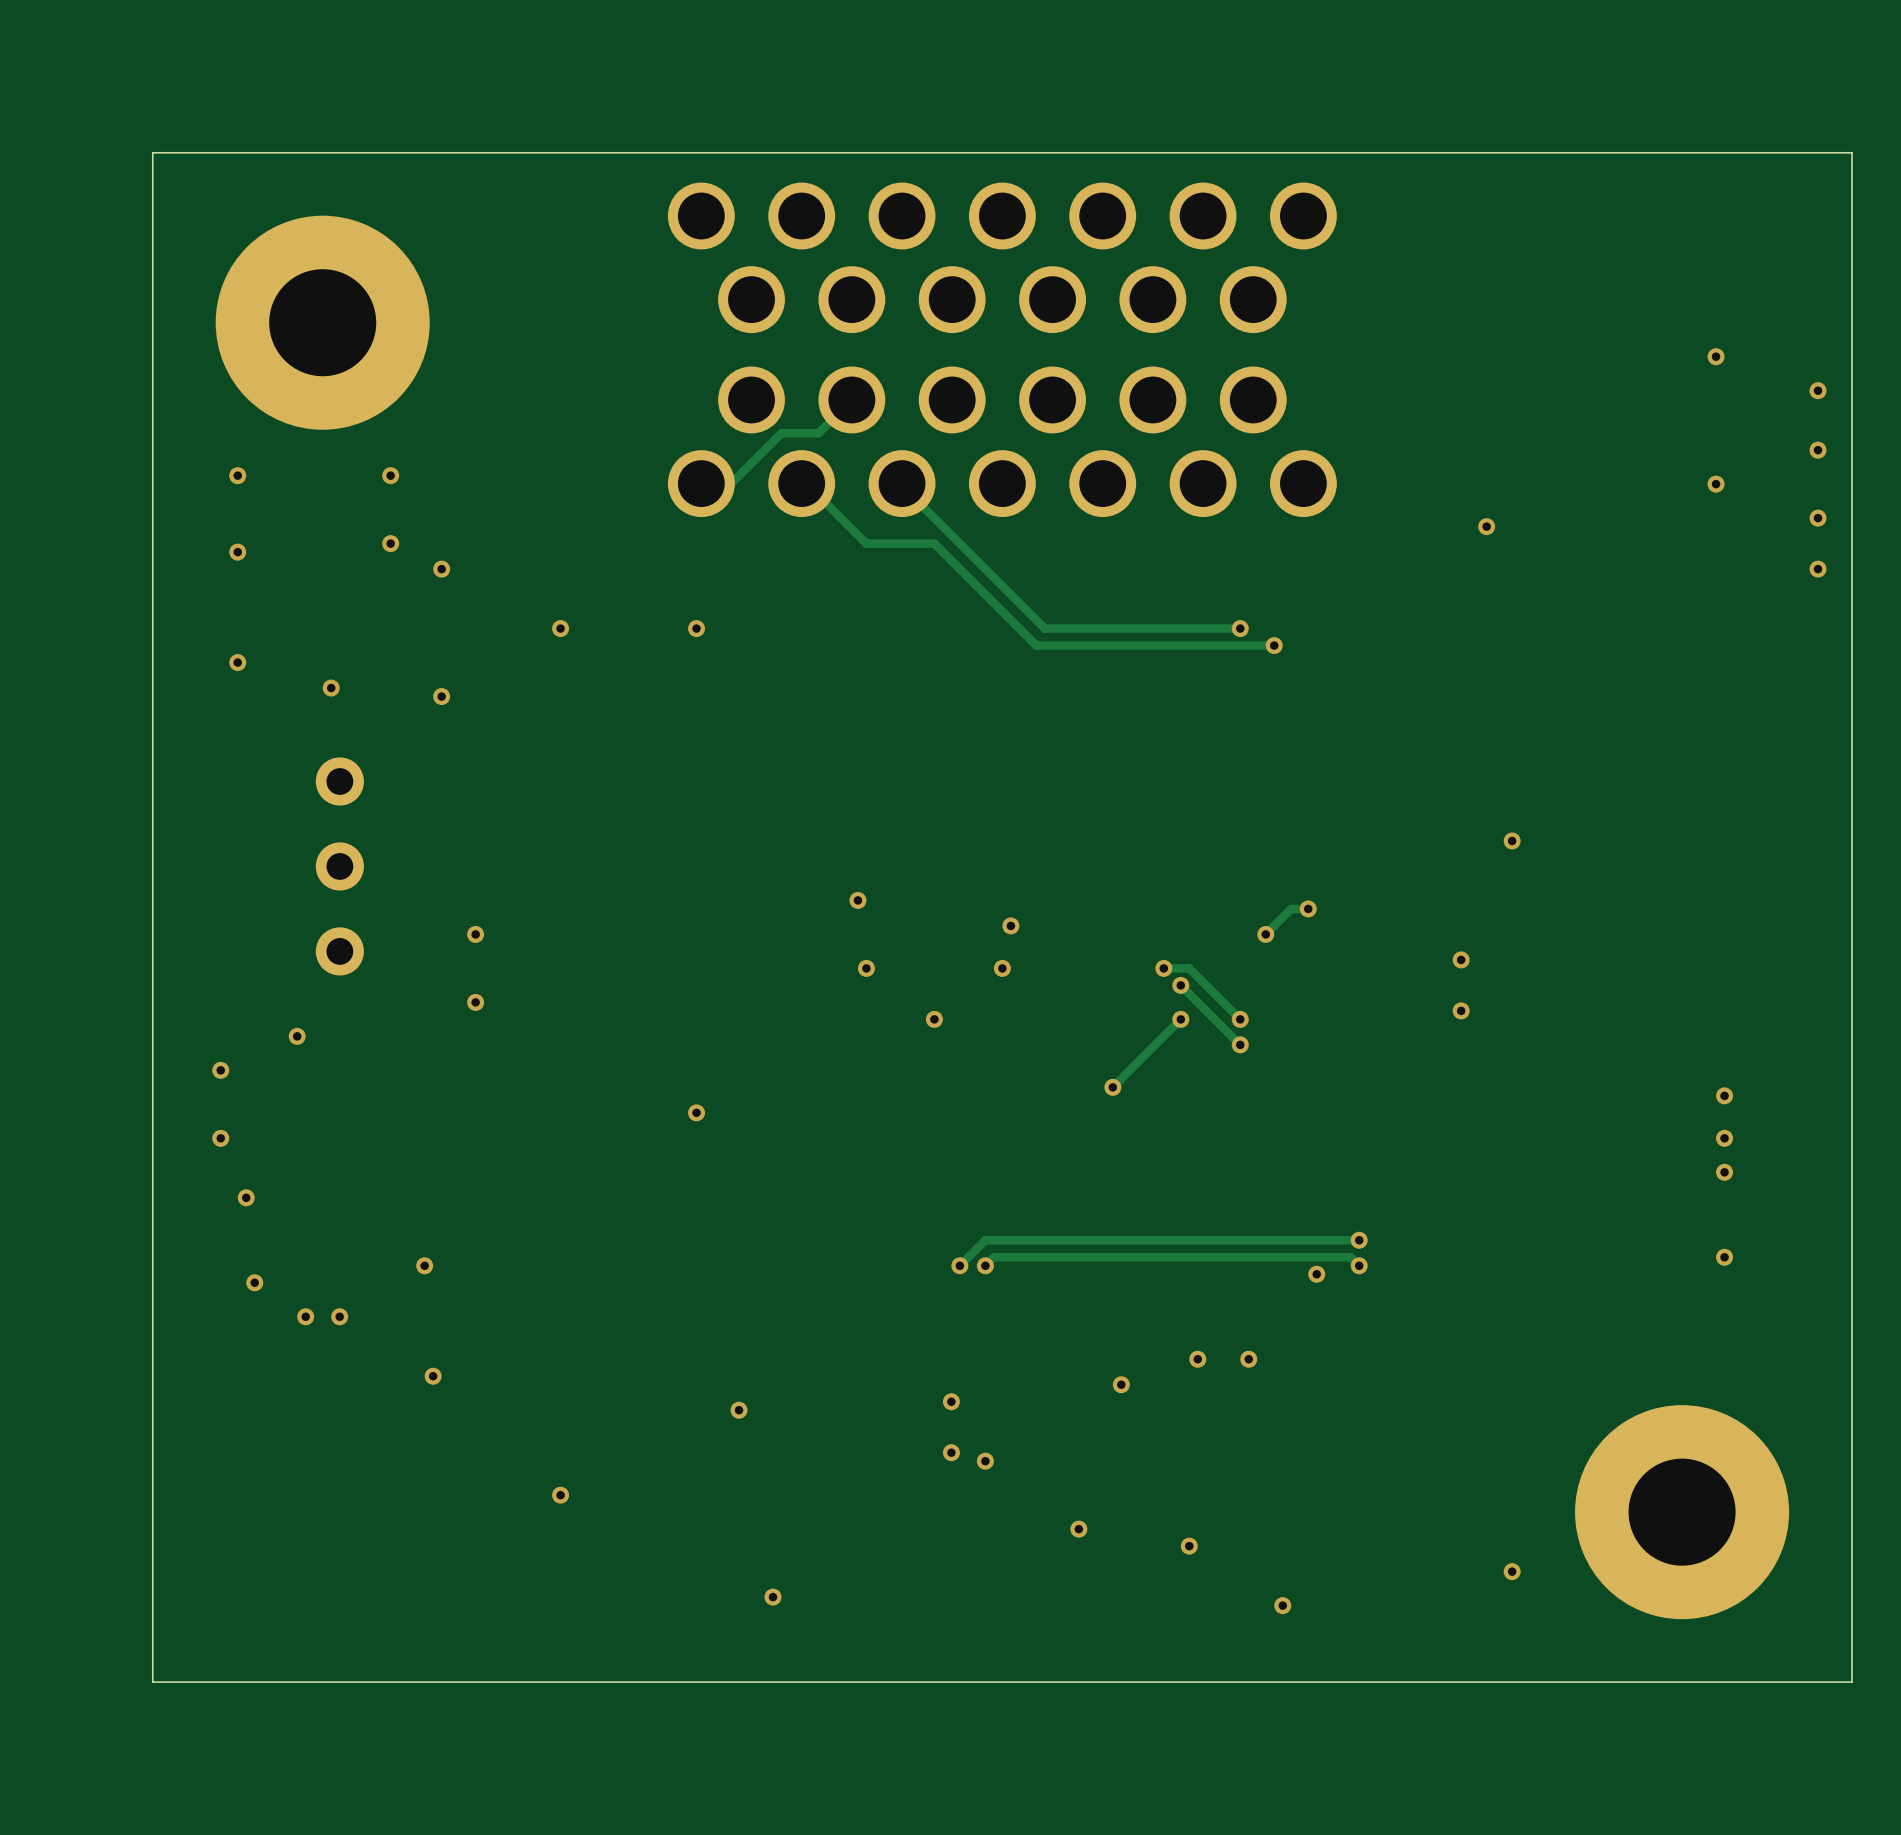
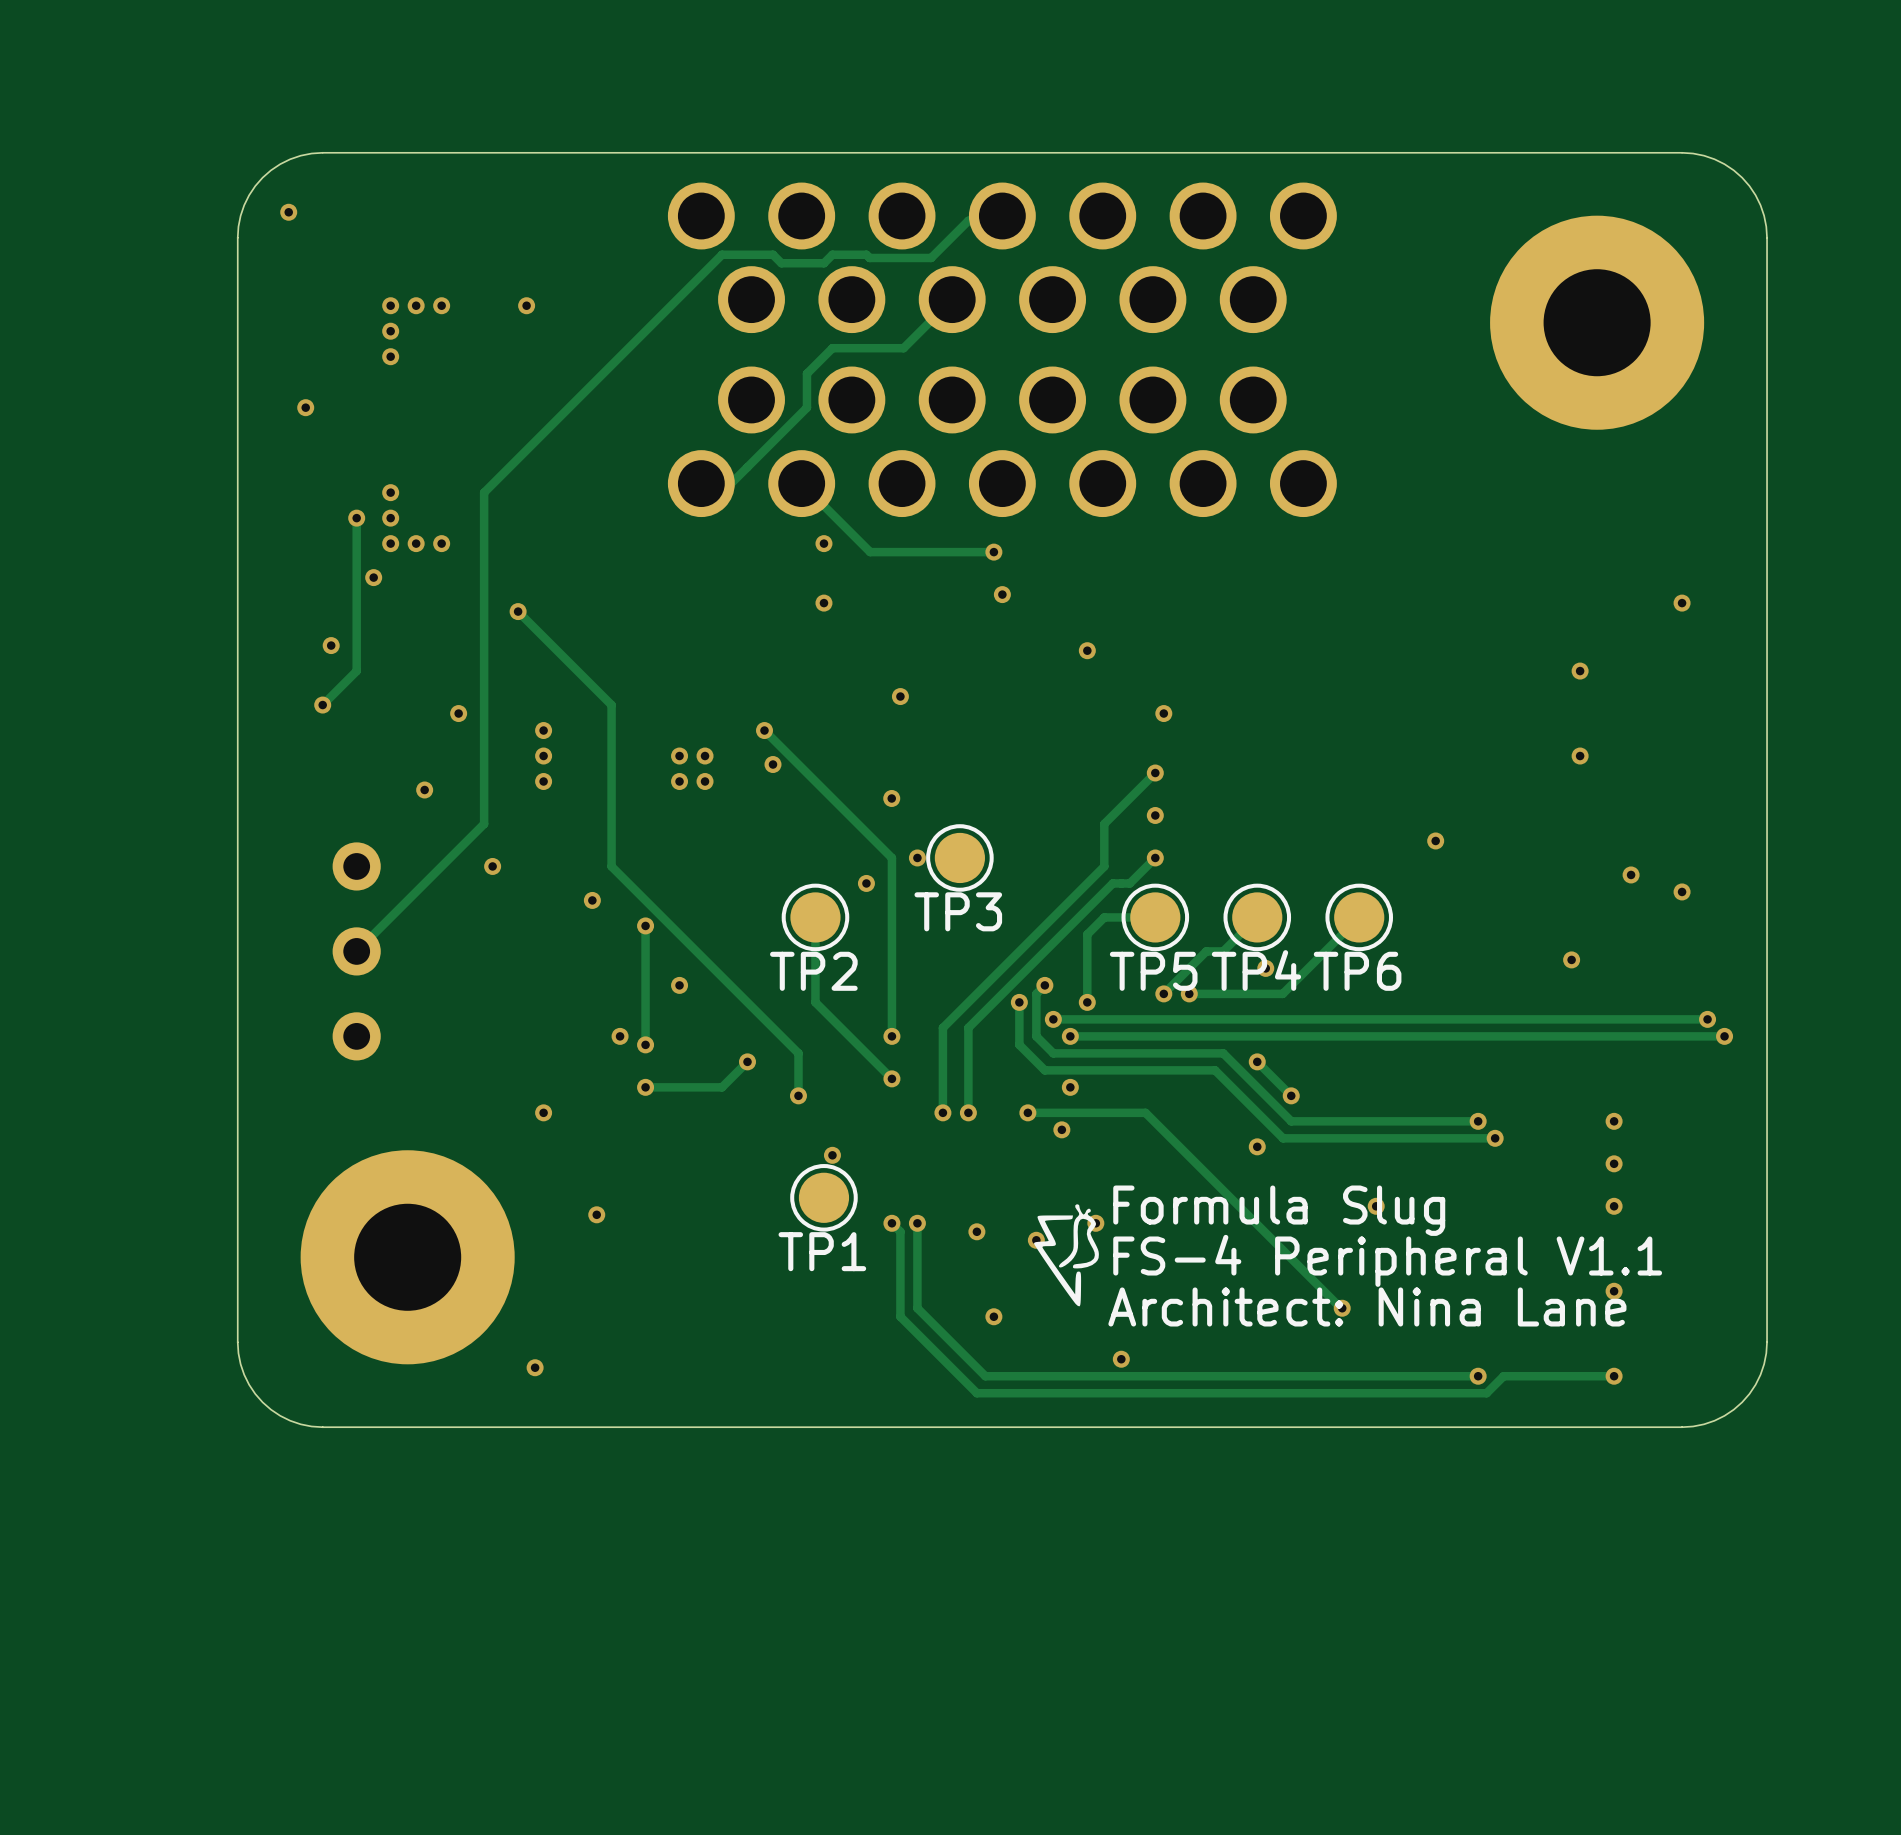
board edge: (1682, 152) (1851, 152) (1851, 1682) (152, 1682) (152, 152) (322, 152) -> (1682, 152) (1714, 159) (1742, 177) (1760, 205) (1767, 237) (1766, 1353) (1755, 1384) (1733, 1409) (1704, 1424) (1682, 1427) (322, 1427) (290, 1420) (262, 1402) (244, 1374) (237, 1342) (237, 237) (244, 205) (262, 177) (290, 159) (322, 152)
via: none -> (288, 212)
track: none -> (985, 220) (968, 220) (931, 257) (869, 257) (866, 254) (832, 254) (823, 263) (781, 263) (772, 254) (722, 254) (484, 492) (484, 823) (356, 951)
via: none -> (390, 305)
via: none -> (416, 305)
via: none -> (441, 305)
via: none -> (526, 305)
part: (322, 322) -> none
part: none -> (1597, 322)
via: none -> (390, 331)
via: none -> (390, 356)
via: (1716, 356) -> none
via: (1818, 390) -> none
track: (851, 399) (818, 433) (781, 433) -> (952, 299) (903, 348) (832, 348) (806, 373) (806, 407) (781, 433)
via: none -> (305, 407)
via: (1818, 450) -> none
via: (237, 475) -> none
via position: (390, 475) -> (390, 492)
track: (801, 483) (806, 483) (866, 543) (934, 543) (1036, 645) (1274, 645) -> (801, 483) (870, 552) (993, 552)
via: (1716, 484) -> none
track: (902, 485) (1044, 628) (1240, 628) -> none
track: none -> (356, 518) (356, 671) (322, 705)
via: none -> (356, 518)
via: none -> (390, 518)
via: (1818, 518) -> none
via: (1486, 526) -> none
via: none -> (416, 543)
via: none -> (441, 543)
via: none -> (823, 543)
via: (237, 552) -> none
via: none -> (993, 552)
via: (441, 569) -> none
via: (1818, 569) -> none
via: none -> (373, 577)
via: none -> (1002, 594)
via: none -> (823, 603)
via: none -> (1682, 603)
track: none -> (518, 611) (611, 705) (611, 866) (798, 1053) (798, 1095)
via: none -> (518, 611)
via: (560, 628) -> none
via: (696, 628) -> none
via: (1240, 628) -> none
via: none -> (331, 645)
via: (1274, 645) -> none
via: none -> (1087, 650)
via: (237, 662) -> none
via: none -> (1580, 671)
via position: (331, 688) -> (322, 705)
via position: (441, 696) -> (458, 713)
via: none -> (900, 696)
via: none -> (1163, 713)
via: none -> (543, 730)
track: none -> (764, 730) (891, 857) (891, 1036)
via: none -> (764, 730)
via: none -> (543, 756)
via: none -> (679, 756)
via: none -> (705, 756)
via: none -> (1580, 756)
via: none -> (772, 764)
track: none -> (1155, 773) (1104, 824) (1104, 866) (942, 1027) (942, 1112)
via: none -> (1155, 773)
via: none -> (543, 781)
via: none -> (679, 781)
via: none -> (705, 781)
via: none -> (424, 790)
via: none -> (891, 798)
via: none -> (1155, 815)
via: none -> (1435, 840)
via: (1512, 840) -> none
via: none -> (917, 857)
TP3: none -> (959, 857)
track: none -> (1155, 857) (1129, 883) (1121, 883)
via: none -> (1155, 857)
part position: (339, 866) -> (356, 951)
via: none -> (492, 866)
via: none -> (1631, 874)
track: none -> (1121, 883) (1112, 883) (968, 1027) (968, 1112)
via: none -> (1682, 891)
via: none -> (592, 900)
via position: (857, 900) -> (866, 883)
track: (1308, 908) (1291, 908) (1265, 934) -> none
via: (1308, 908) -> none
track: none -> (815, 917) (815, 1002) (891, 1078)
TP2: none -> (815, 917)
track: none -> (1155, 917) (1104, 917) (1087, 934) (1087, 1002)
TP5: none -> (1155, 917)
track: none -> (1257, 917) (1223, 951) (1206, 951) (1163, 993)
TP4: none -> (1257, 917)
track: none -> (1359, 917) (1282, 993) (1189, 993)
TP6: none -> (1359, 917)
track: none -> (645, 925) (645, 1044)
via: none -> (645, 925)
via: (1010, 925) -> none
via: (475, 934) -> none
via: (1265, 934) -> none
via: (1461, 959) -> none
via: none -> (1571, 959)
via: (866, 968) -> none
via: (1002, 968) -> none
track: (1163, 968) (1189, 968) (1240, 1019) -> none
via: (1163, 968) -> none
via: none -> (1265, 968)
via: none -> (679, 985)
track: none -> (1044, 985) (1036, 993) (1036, 1036) (1053, 1053) (1223, 1053) (1291, 1121) (1478, 1121)
via: none -> (1044, 985)
track: (1180, 985) (1240, 1044) -> none
via position: (1180, 985) -> (1189, 993)
via: none -> (1163, 993)
via: (475, 1002) -> none
track: none -> (1019, 1002) (1019, 1044) (1044, 1070) (1215, 1070) (1283, 1138) (1495, 1138)
via: none -> (1019, 1002)
via: none -> (1087, 1002)
via: (1461, 1010) -> none
via: (934, 1019) -> none
via: none -> (1053, 1019)
track: (1180, 1019) (1112, 1087) -> none
via: (1180, 1019) -> none
via: (1240, 1019) -> none
track: none -> (1707, 1019) (1053, 1019)
via: none -> (1707, 1019)
via: (297, 1036) -> none
via: none -> (620, 1036)
via: none -> (891, 1036)
via: none -> (1070, 1036)
track: none -> (1724, 1036) (1070, 1036)
via: none -> (1724, 1036)
via: none -> (645, 1044)
via: (1240, 1044) -> none
track: none -> (747, 1061) (722, 1087) (645, 1087)
via: none -> (747, 1061)
track: none -> (1257, 1061) (1291, 1095)
via: none -> (1257, 1061)
via: (220, 1070) -> none
via: none -> (891, 1078)
via: none -> (645, 1087)
via: none -> (1070, 1087)
via: (1112, 1087) -> none
via: none -> (798, 1095)
via: none -> (1291, 1095)
via: (1724, 1095) -> none
via: none -> (543, 1112)
via: (696, 1112) -> none
via: none -> (942, 1112)
via: none -> (968, 1112)
track: none -> (1027, 1112) (1145, 1112) (1342, 1308)
via: none -> (1027, 1112)
via: none -> (1478, 1121)
via: none -> (1614, 1121)
via: none -> (1061, 1129)
via: (220, 1138) -> none
via: none -> (1495, 1138)
via: (1724, 1138) -> none
via: none -> (1257, 1146)
via: none -> (832, 1155)
via: none -> (1614, 1163)
via: (1724, 1172) -> none
via: (246, 1197) -> none
TP1: none -> (823, 1197)
drawing: none -> [1033, 1204, 1099, 1307]
via: none -> (1376, 1206)
via: none -> (1614, 1206)
via: none -> (596, 1214)
track: none -> (891, 1223) (900, 1231) (900, 1316) (976, 1393) (1486, 1393) (1503, 1376) (1614, 1376)
via: none -> (891, 1223)
track: none -> (917, 1223) (917, 1308) (985, 1376) (1478, 1376)
via: none -> (917, 1223)
via: none -> (1095, 1223)
via: none -> (976, 1231)
via: none -> (1036, 1240)
track: (1359, 1240) (985, 1240) (959, 1265) -> none
via: (1359, 1240) -> none
part: none -> (407, 1257)
via: (1724, 1257) -> none
via: (424, 1265) -> none
via: (959, 1265) -> none
via: (985, 1265) -> none
track: (1359, 1265) (1350, 1257) (993, 1257) (985, 1265) -> none
via: (1359, 1265) -> none
via: (1316, 1274) -> none
via: (254, 1282) -> none
via: none -> (1614, 1291)
via: none -> (1342, 1308)
via: (305, 1316) -> none
via: (339, 1316) -> none
via: none -> (993, 1316)
via: (1197, 1359) -> none
via: (1248, 1359) -> none
via: none -> (535, 1367)
via: (433, 1376) -> none
via: none -> (1478, 1376)
via: none -> (1614, 1376)
via position: (1121, 1384) -> (1121, 1359)
via: (951, 1401) -> none
via: (739, 1410) -> none
via: (951, 1452) -> none
via: (985, 1461) -> none
via: (560, 1495) -> none
part: (1682, 1512) -> none
via: (1078, 1529) -> none
via: (1189, 1546) -> none
via: (1512, 1571) -> none
via: (772, 1597) -> none
via: (1282, 1605) -> none

